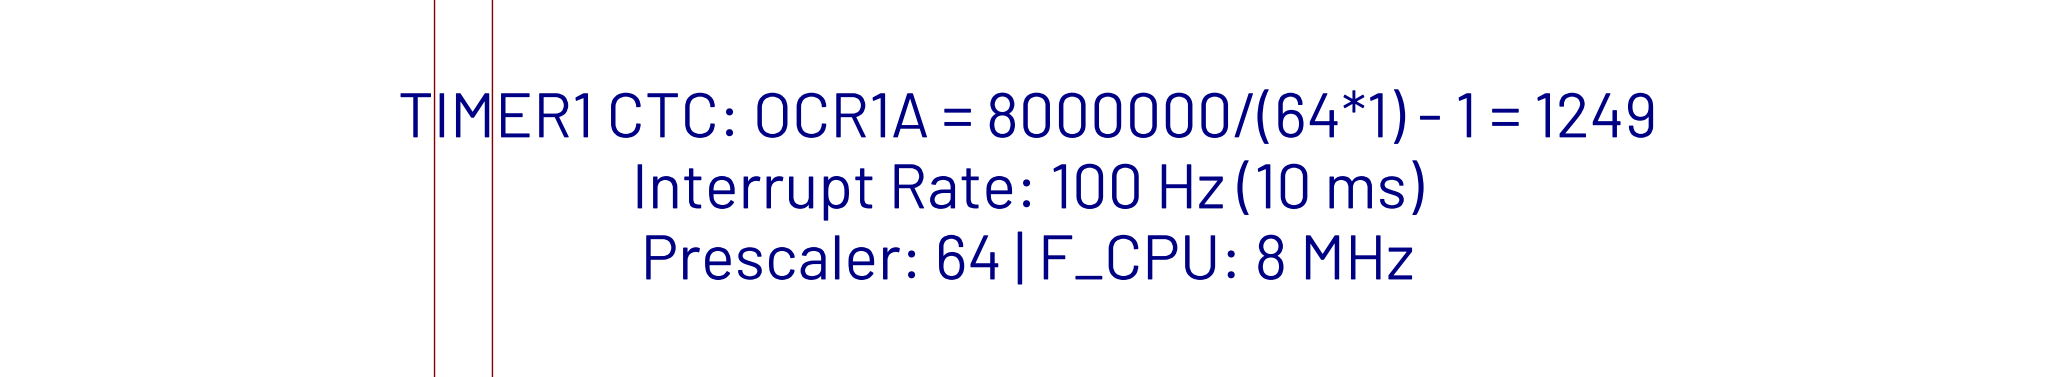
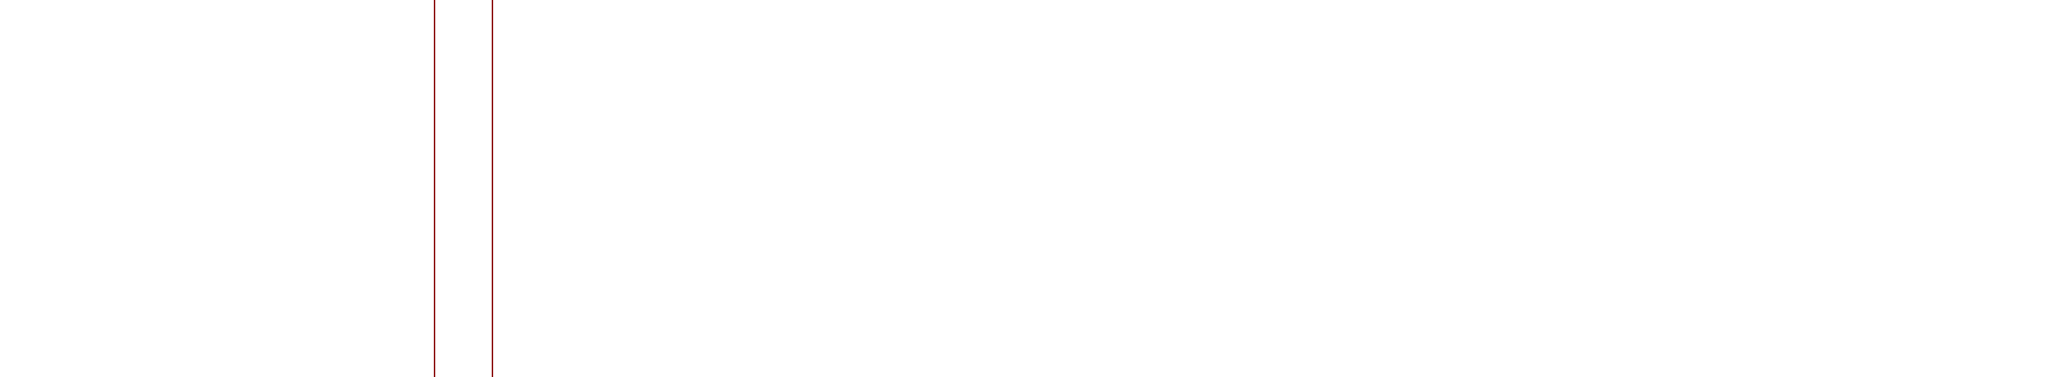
text: TIMER1 CTC: OCR1A = 8000000/(64*1) - 1 = 1249 (1026, 116) -> none
text: Interrupt Rate: 100 Hz (10 ms) (1030, 190) -> none
text: Prescaler: 64 | F_CPU: 8 MHz (1029, 258) -> none

